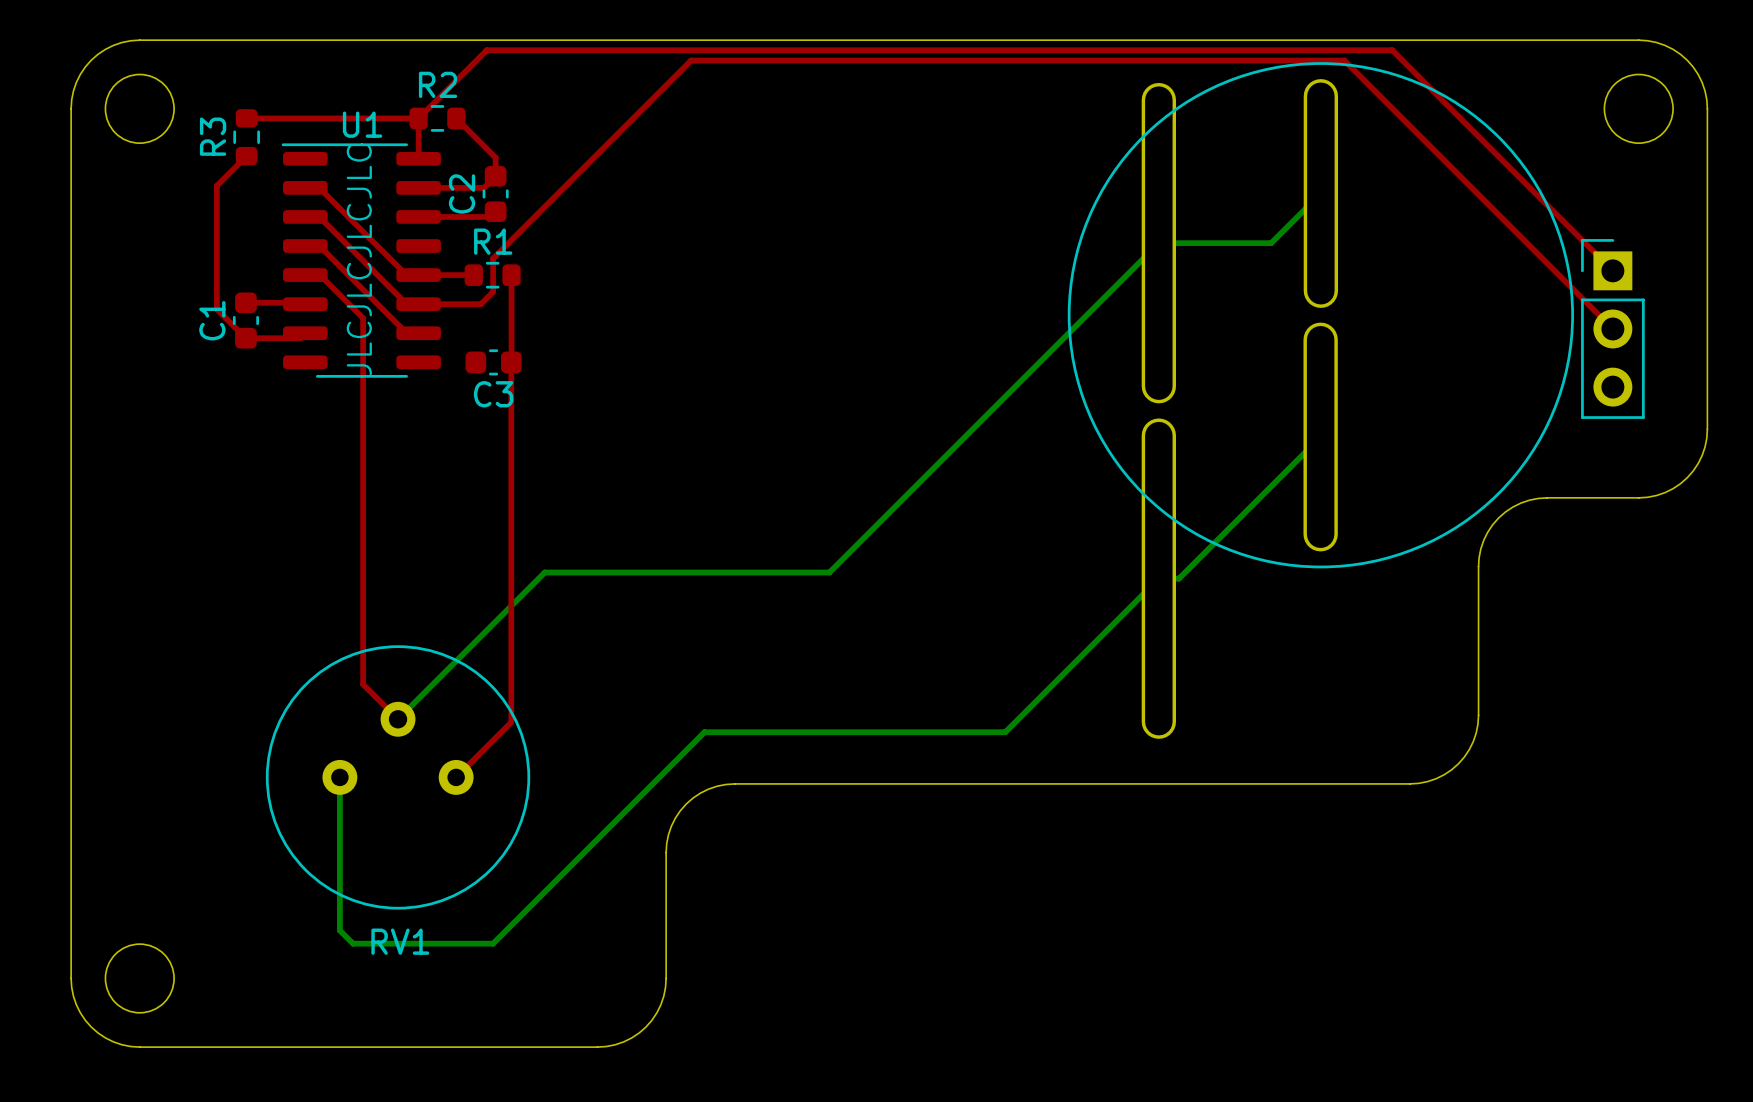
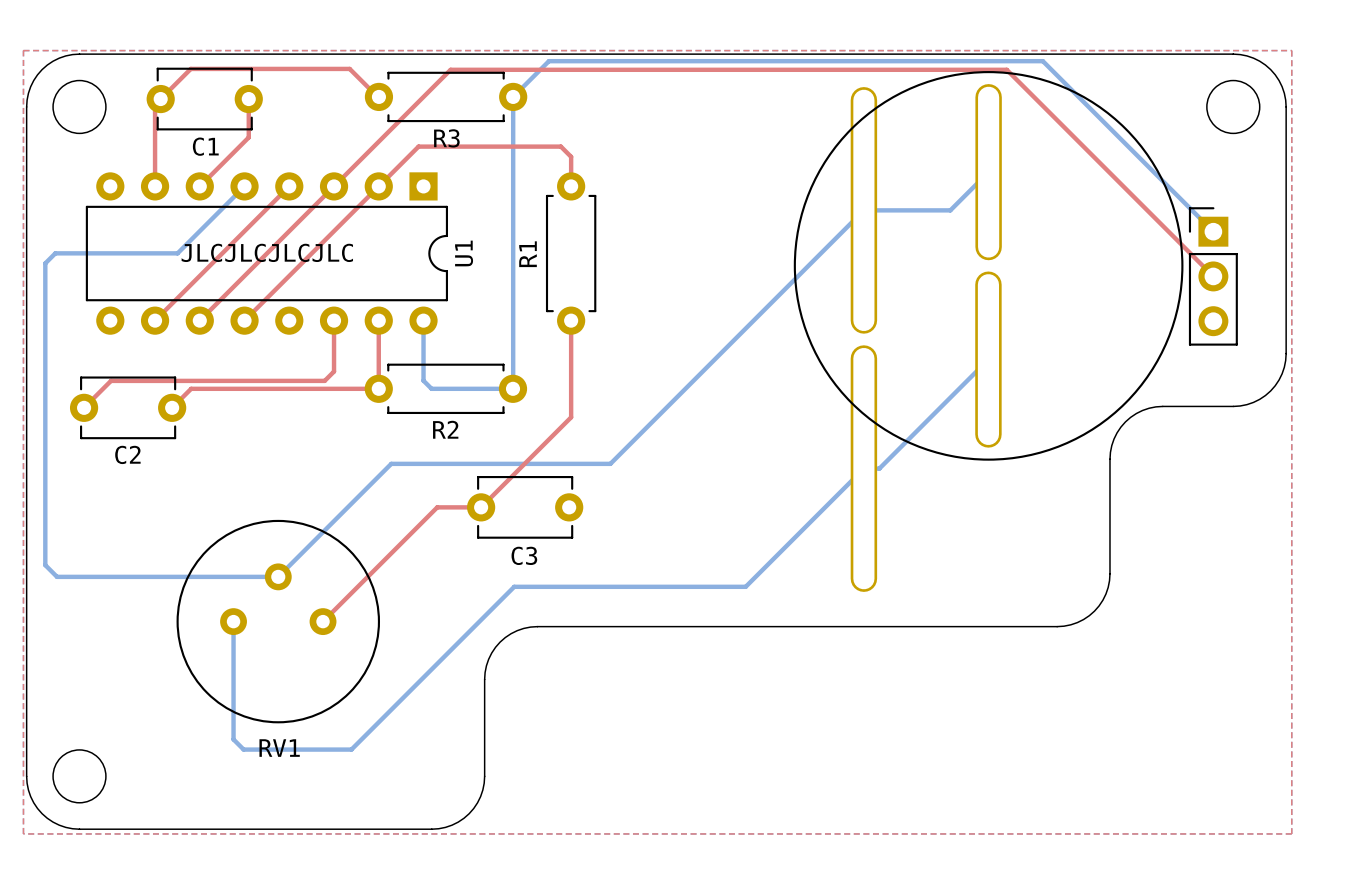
top zone outline: none -> (23, 50) (23, 833) (1291, 833) (1291, 50) (23, 50)
top track: (691, 60) (493, 258) (493, 291) (480, 304) (406, 304) (319, 216) (305, 216) -> (503, 69) (450, 69) (199, 320)
R2 name position: R2 (438, 84) -> R2 (445, 429)
top track: none -> (377, 97) (349, 68) (190, 68) (155, 104) (155, 186)
top track: none -> (248, 99) (248, 137) (199, 186)
R2 footprint: [409, 105, 466, 132] -> [364, 363, 528, 415]
R3 footprint: [233, 109, 260, 166] -> [364, 71, 528, 123]
top track: (246, 118) (418, 118) -> none
top track: (418, 118) (418, 158) -> none
top track: (418, 118) (486, 50) (1392, 50) (1612, 270) -> none
top track: (456, 118) (495, 157) (495, 176) (483, 187) (418, 187) -> none
U1 name position: U1 (362, 124) -> U1 (464, 253)
R3 name position: R3 (213, 136) -> R3 (446, 138)
U1 footprint: [281, 143, 441, 378] -> [85, 172, 449, 335]
top track: (246, 155) (216, 185) (216, 309) (245, 338) (300, 338) (305, 333) -> none
C2 footprint: [482, 165, 509, 222] -> [69, 376, 187, 440]
top track: (305, 187) (319, 187) (406, 275) (473, 275) -> none
C2 name position: C2 (462, 193) -> C2 (127, 454)
top track: (495, 211) (490, 216) (418, 216) -> none
bottom track: none -> (244, 186) (177, 253) (55, 253) (45, 263) (45, 565) (57, 576) (278, 576)
top track: none -> (289, 186) (155, 320)
top track: none -> (571, 186) (571, 156) (560, 146) (418, 146) (244, 320)
R1 name position: R1 (493, 241) -> R1 (528, 254)
top track: (305, 246) (319, 246) (406, 333) (418, 333) -> none
text rotation: 0° (359, 260) -> 90° clockwise (267, 252)
R1 footprint: [464, 261, 521, 289] -> [545, 172, 597, 335]
bottom track: none -> (1213, 231) (1042, 61) (548, 61) (513, 96) (513, 388)
top track: (305, 275) (319, 275) (363, 318) (363, 684) (398, 719) -> none
top track: (511, 275) (511, 362) -> none
C1 footprint: [232, 292, 260, 349] -> [146, 67, 263, 131]
top track: (245, 302) (305, 304) -> none
C1 name position: C1 (212, 320) -> C1 (205, 146)
C3 footprint: [465, 349, 522, 376] -> [467, 476, 584, 539]
top track: (511, 362) (511, 722) -> (571, 320) (571, 417) (481, 507) (437, 507) (365, 579)
top track: none -> (334, 320) (334, 371) (324, 380) (111, 380) (84, 407)
top track: none -> (378, 320) (378, 388) (191, 388) (172, 407)
bottom track: none -> (423, 320) (423, 380) (431, 388) (513, 388)

